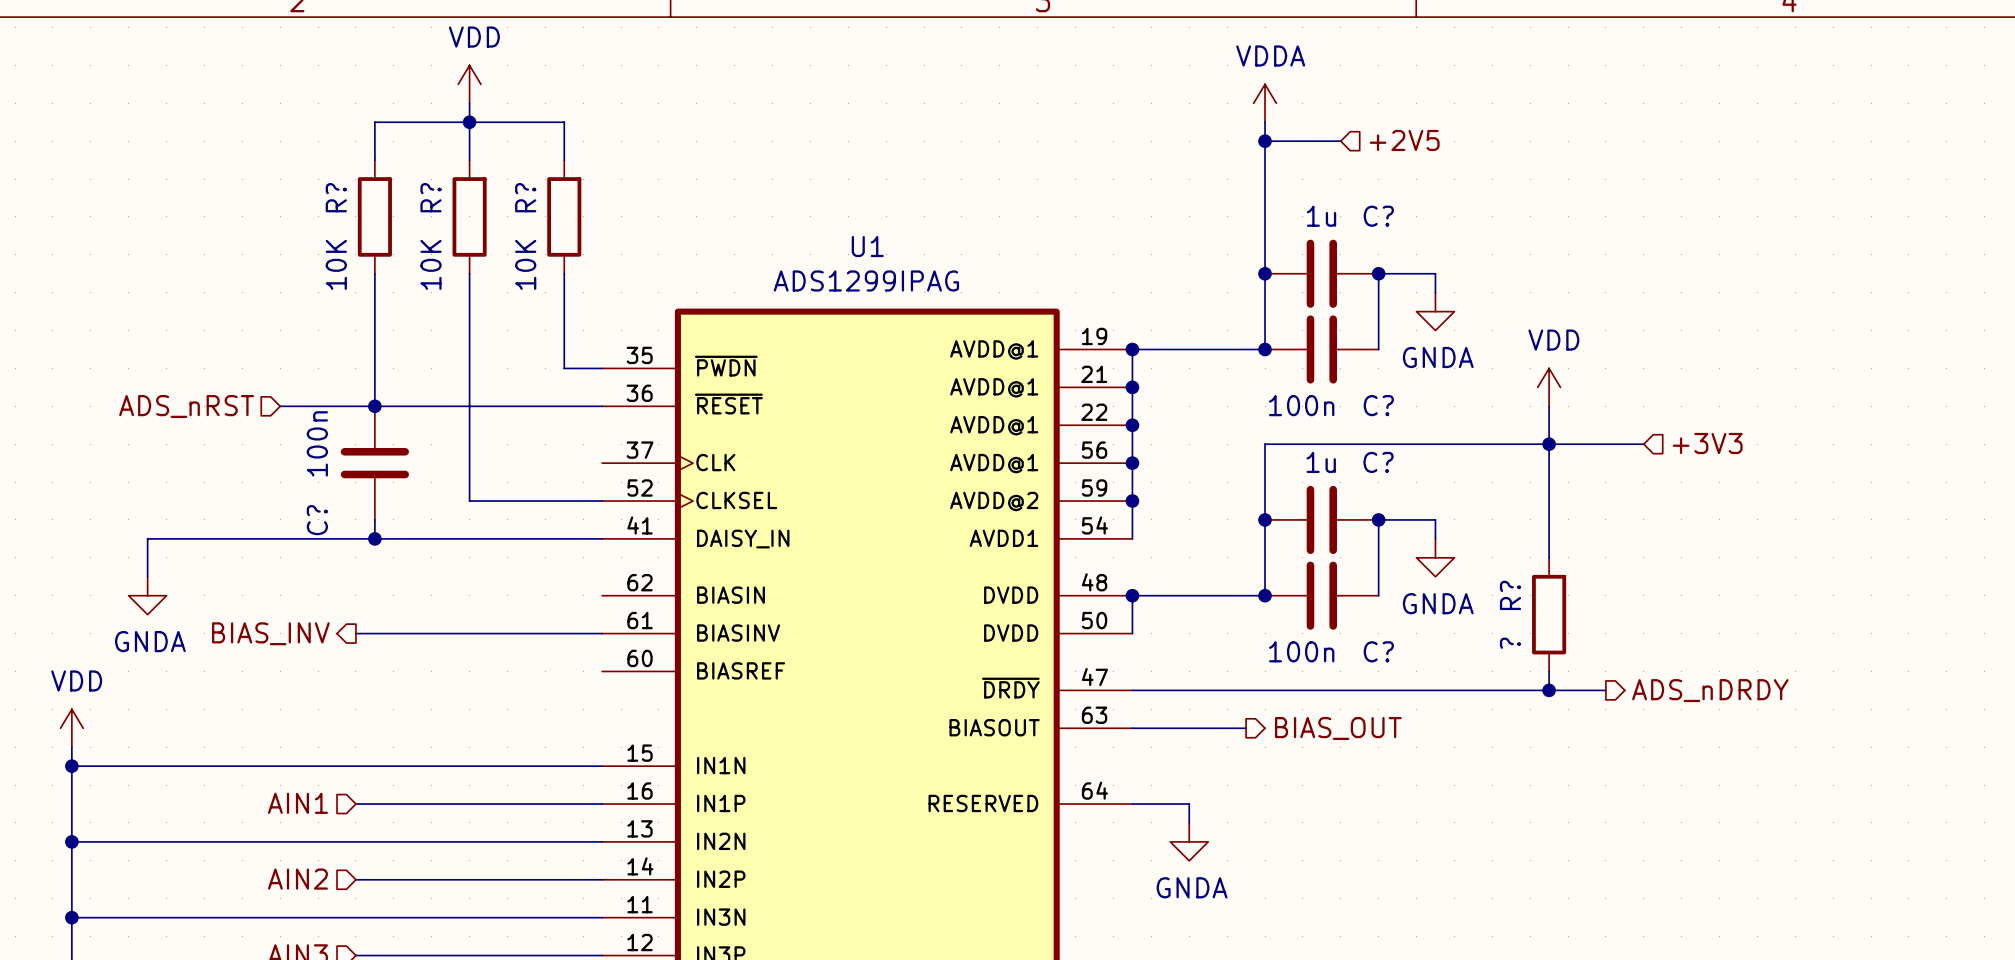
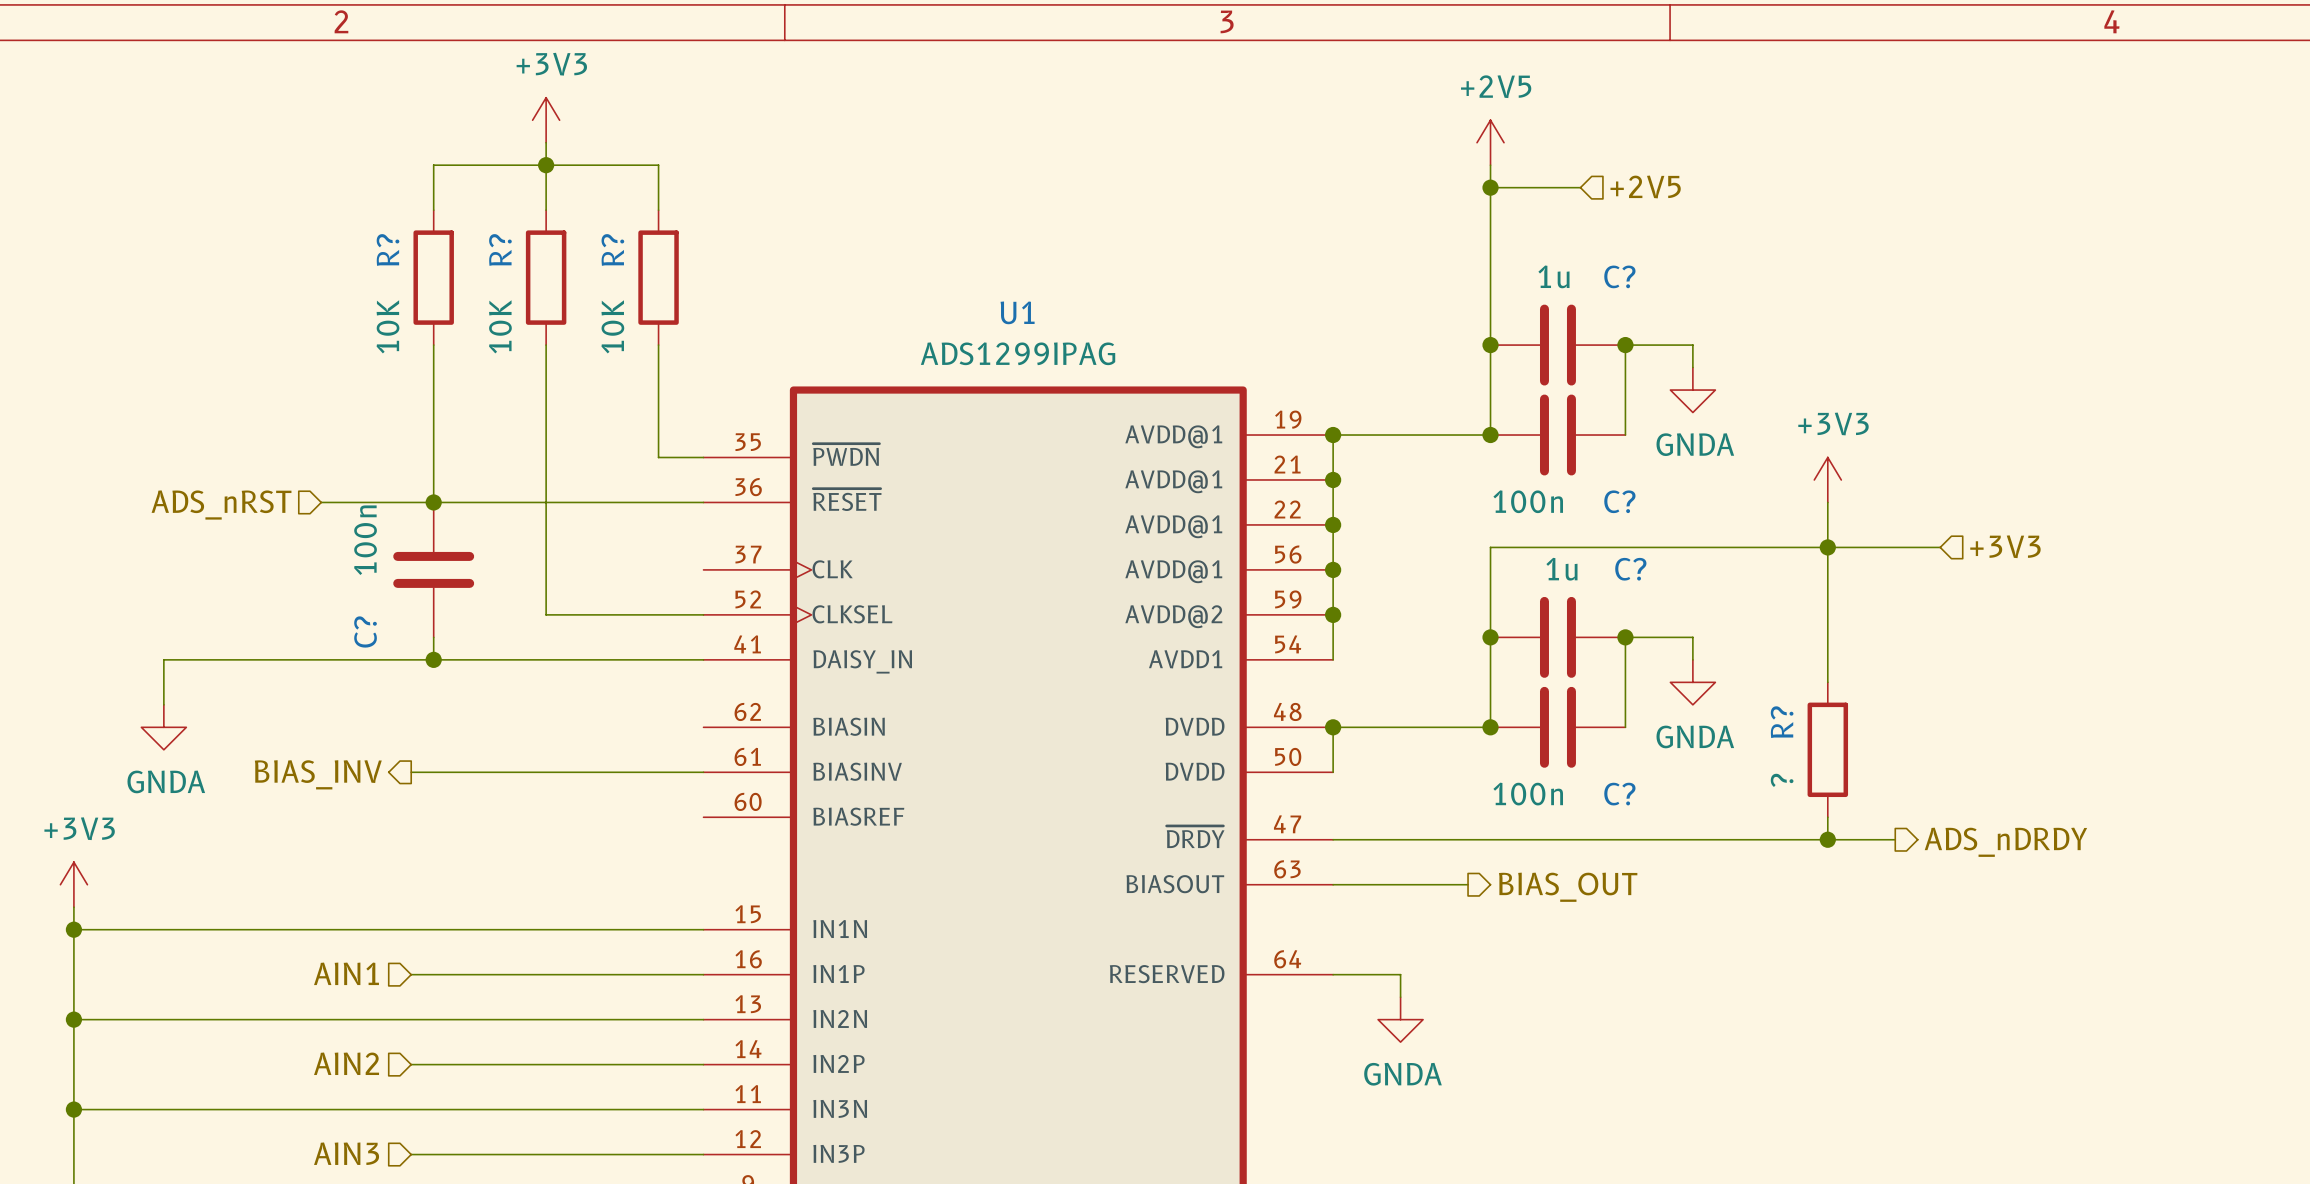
power symbol: VDD (469, 84) -> +3V3 (546, 120)
power symbol: VDDA (1265, 103) -> +2V5 (1490, 142)
power symbol: VDD (1549, 387) -> +3V3 (1827, 479)
power symbol: VDD (71, 728) -> +3V3 (73, 884)

